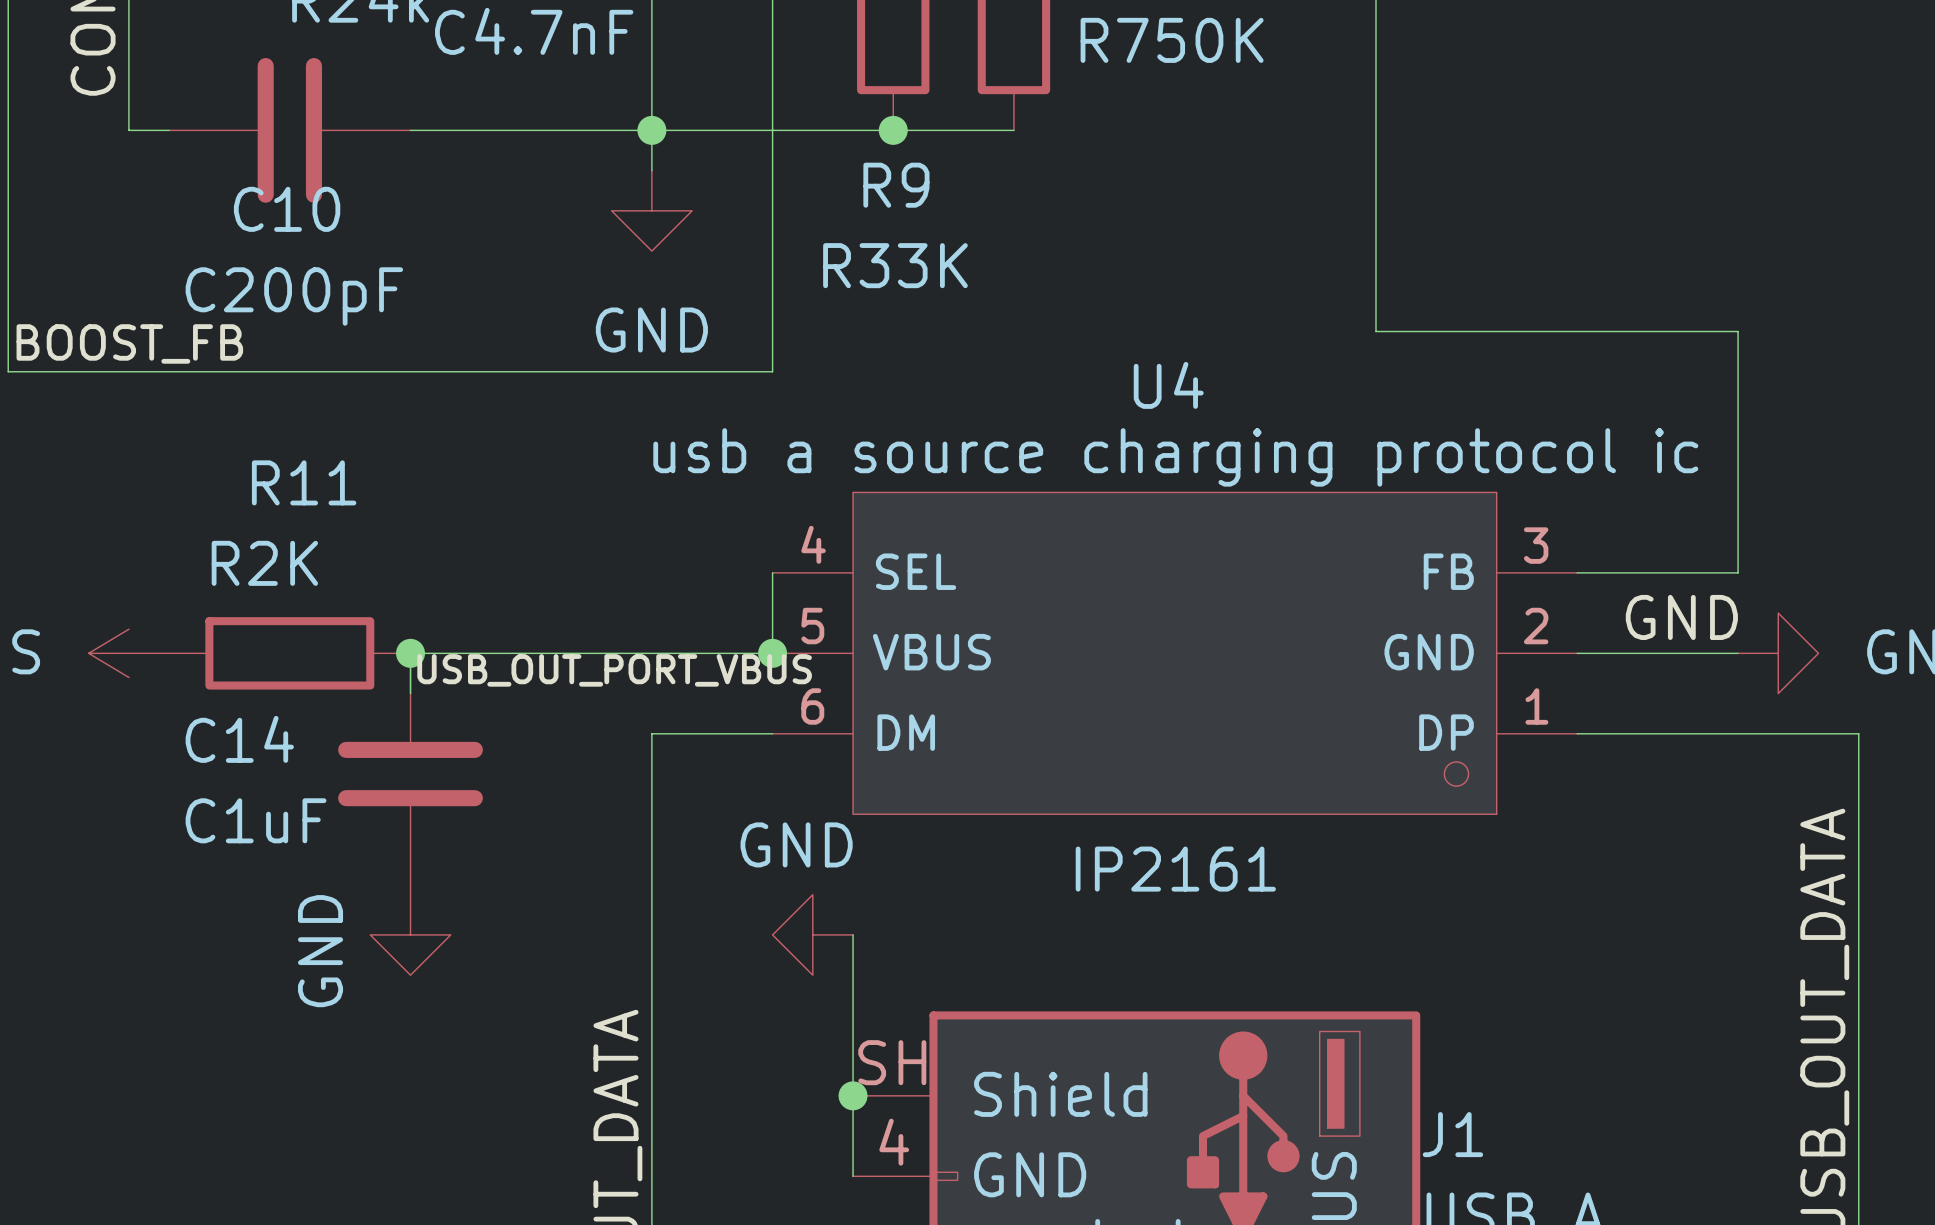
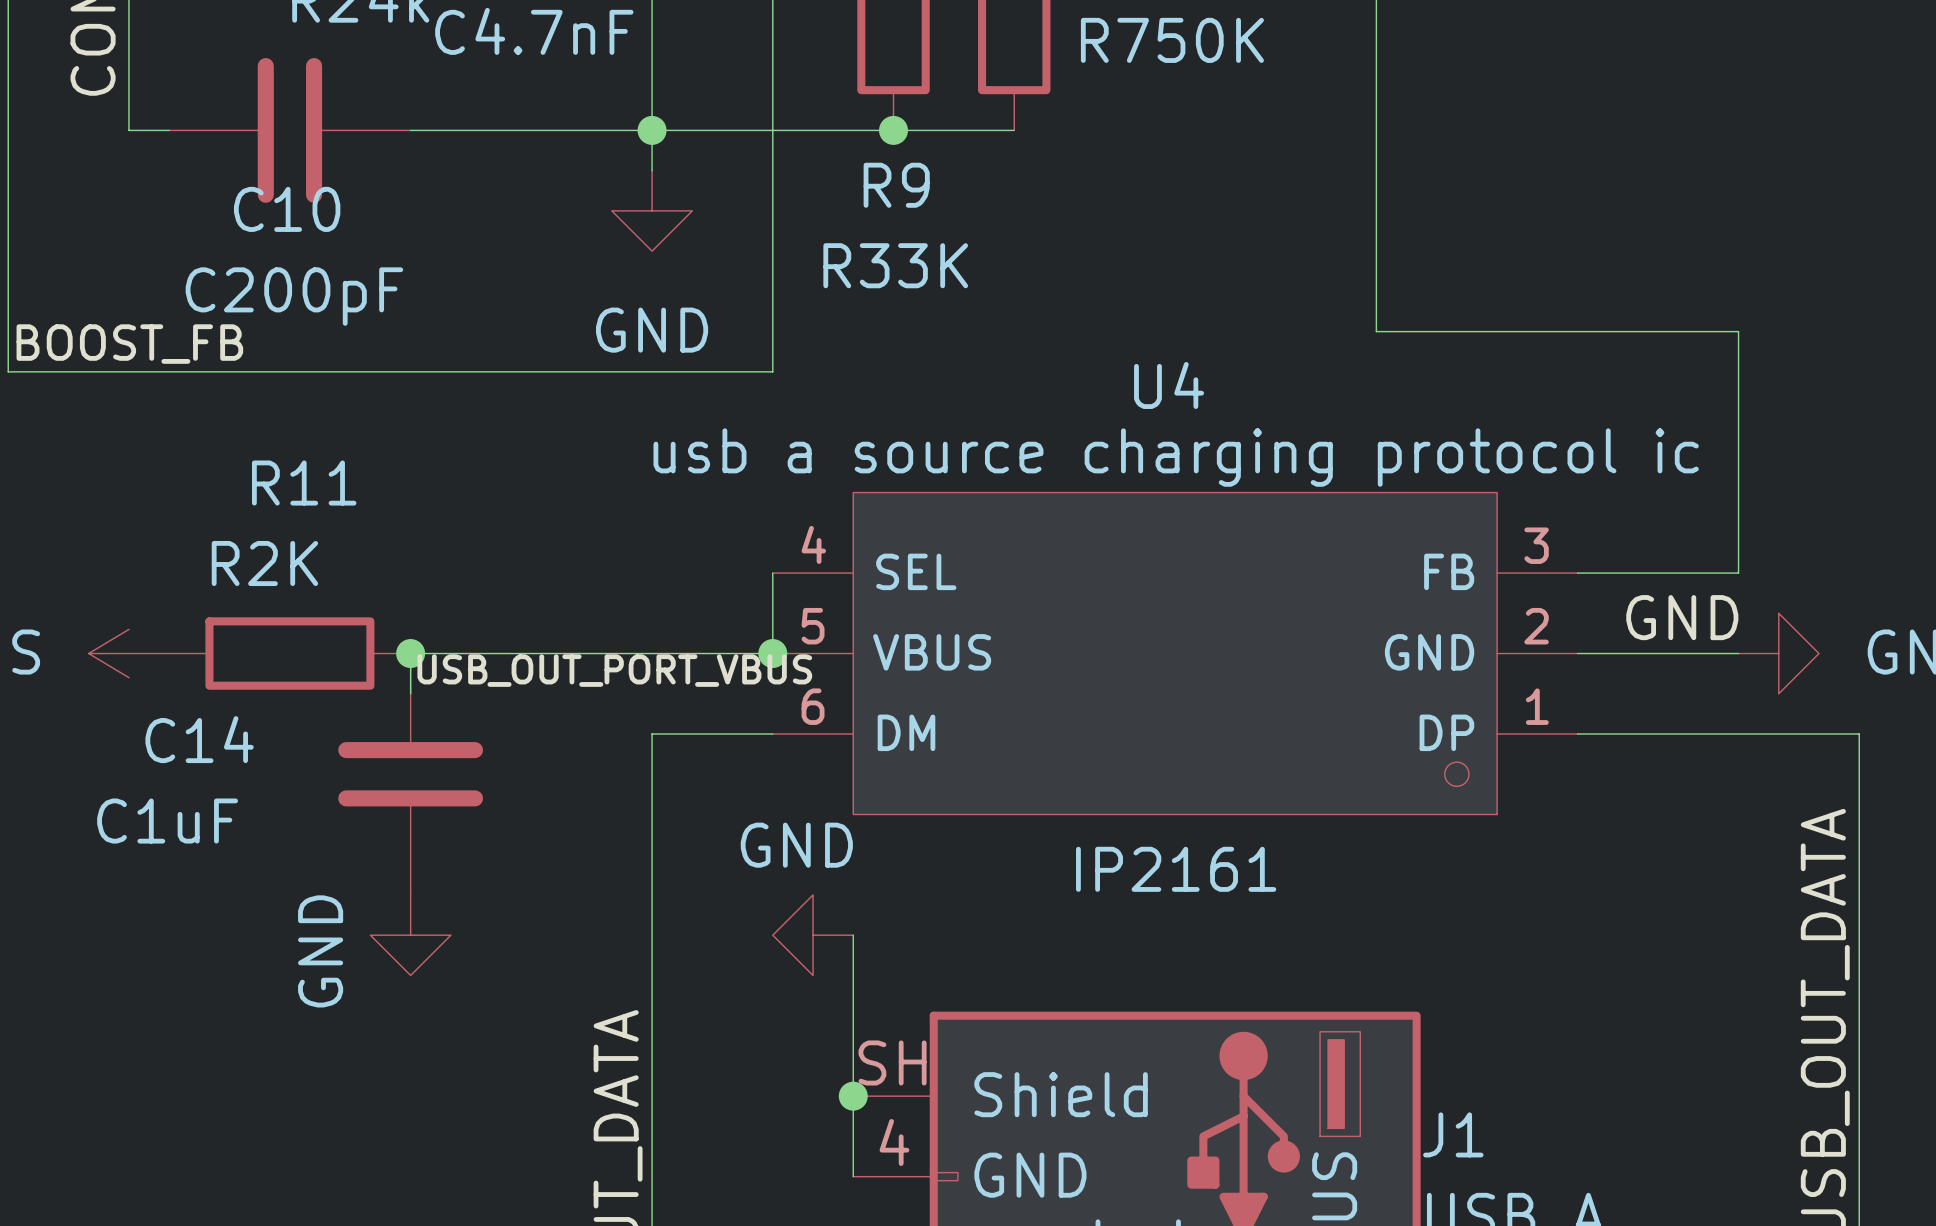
C14 name position: C14 (239, 739) -> C14 (199, 739)
C14 value position: C1uF (256, 820) -> C1uF (167, 821)

